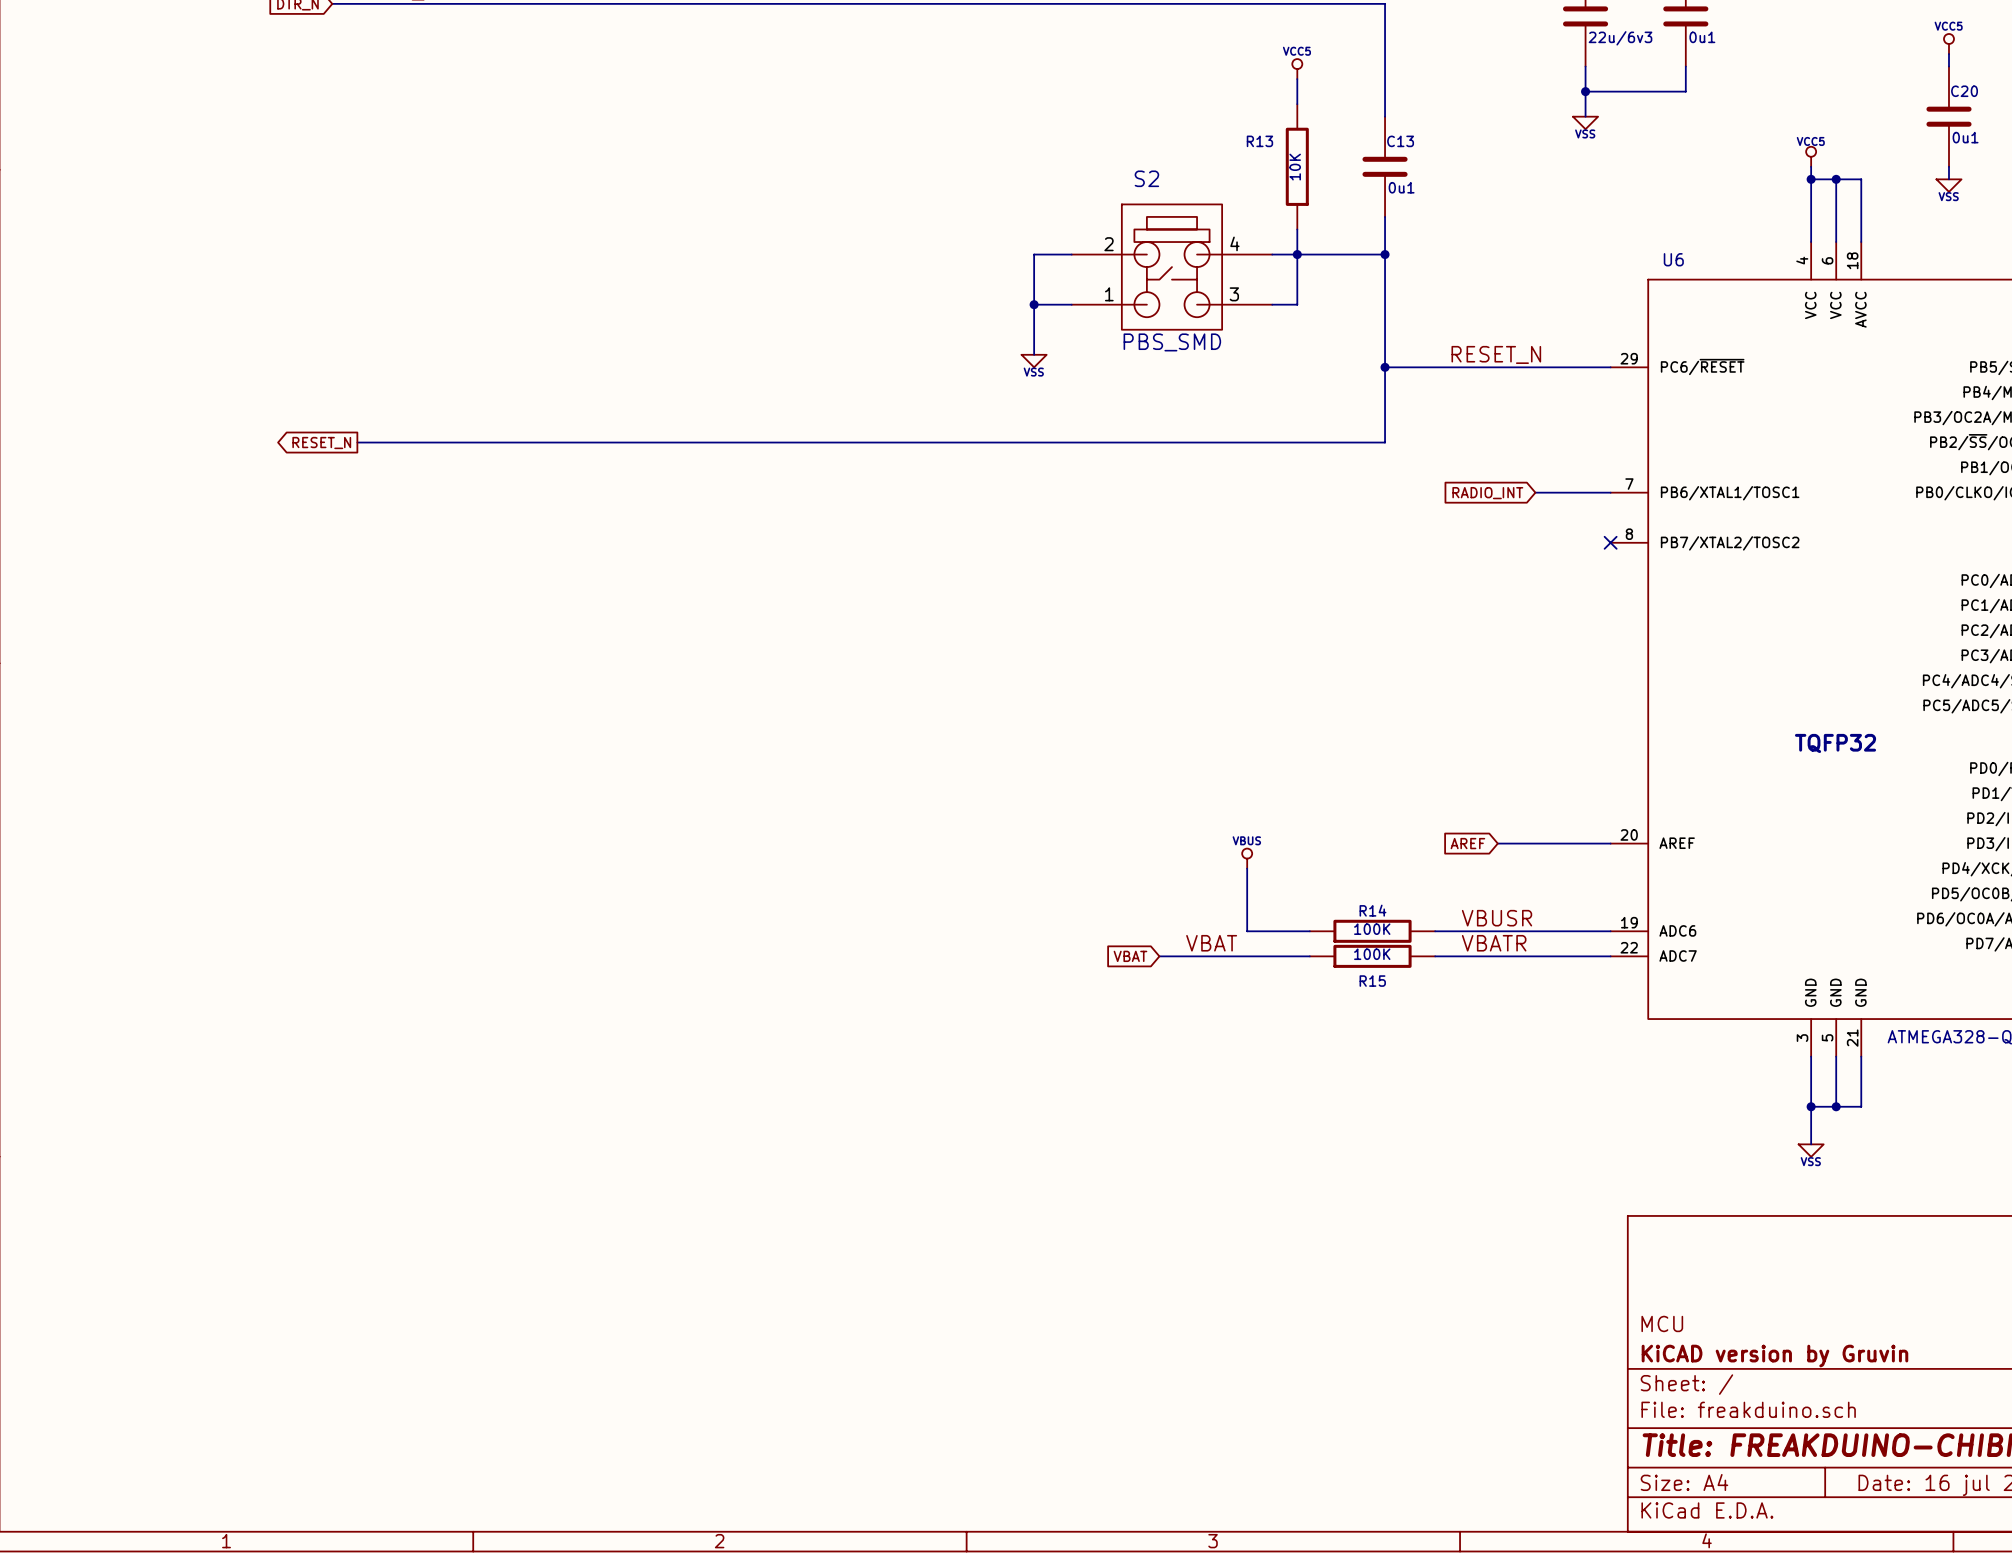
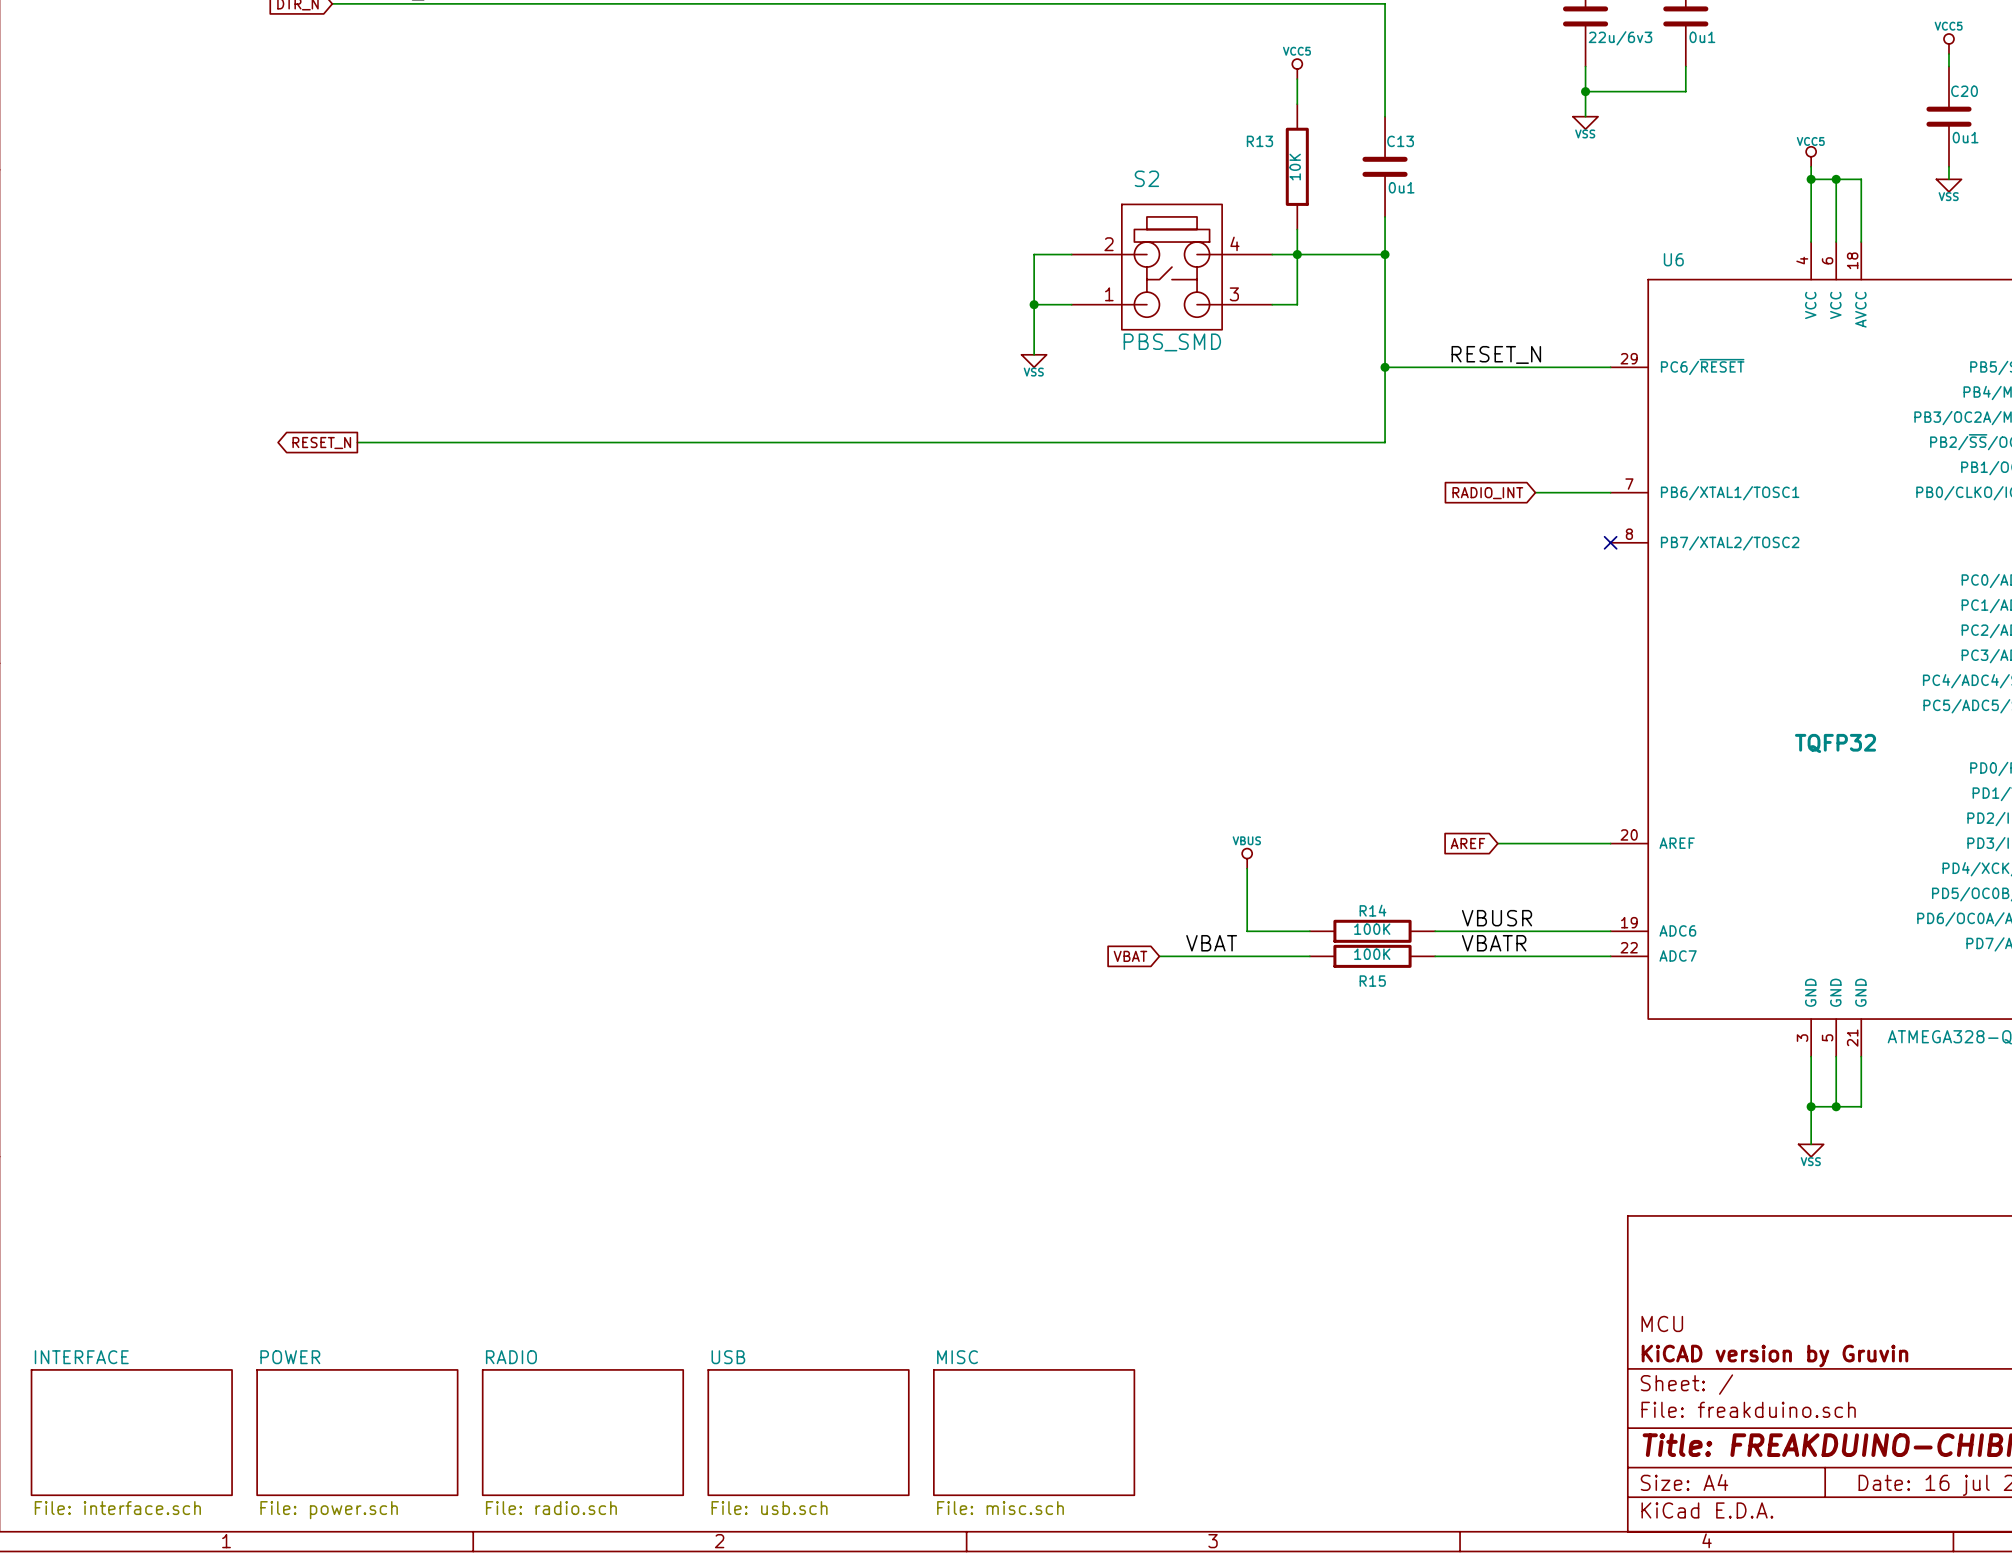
sheet INTERFACE: none -> File: interface.sch (131, 1432)
sheet POWER: none -> File: power.sch (357, 1432)
sheet RADIO: none -> File: radio.sch (582, 1432)
sheet USB: none -> File: usb.sch (808, 1432)
sheet MISC: none -> File: misc.sch (1034, 1432)

